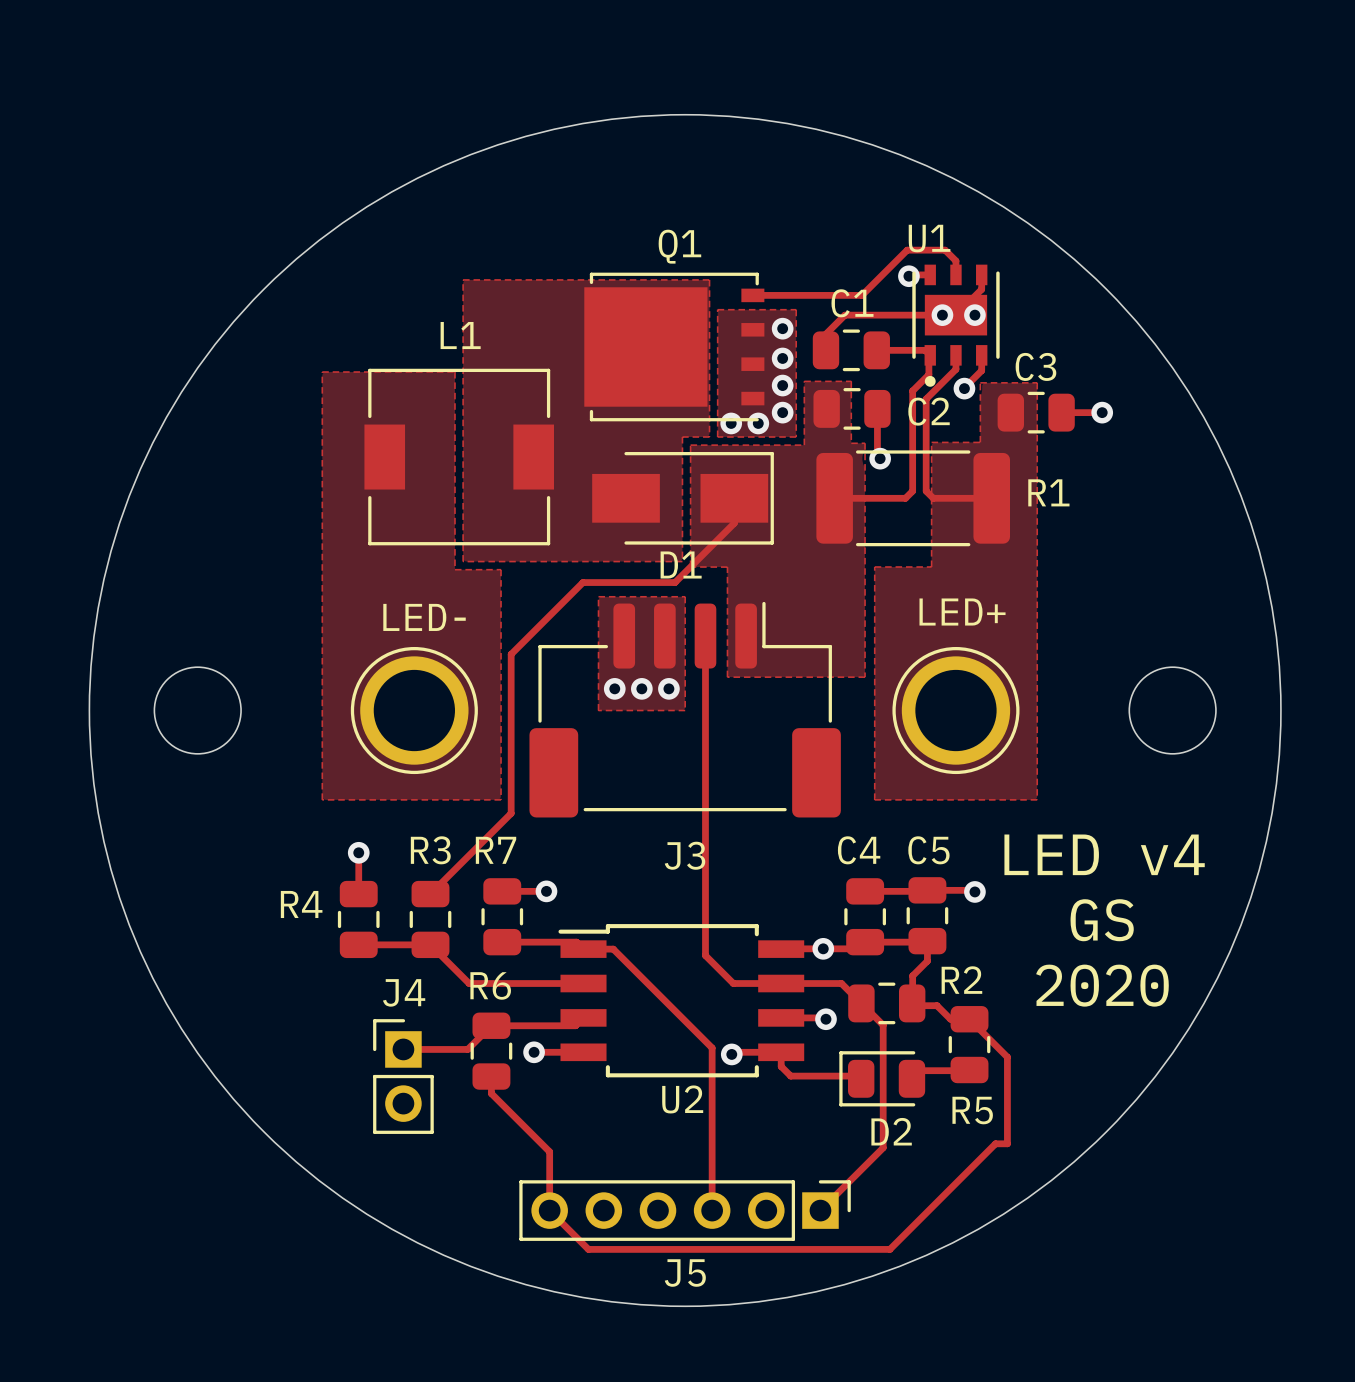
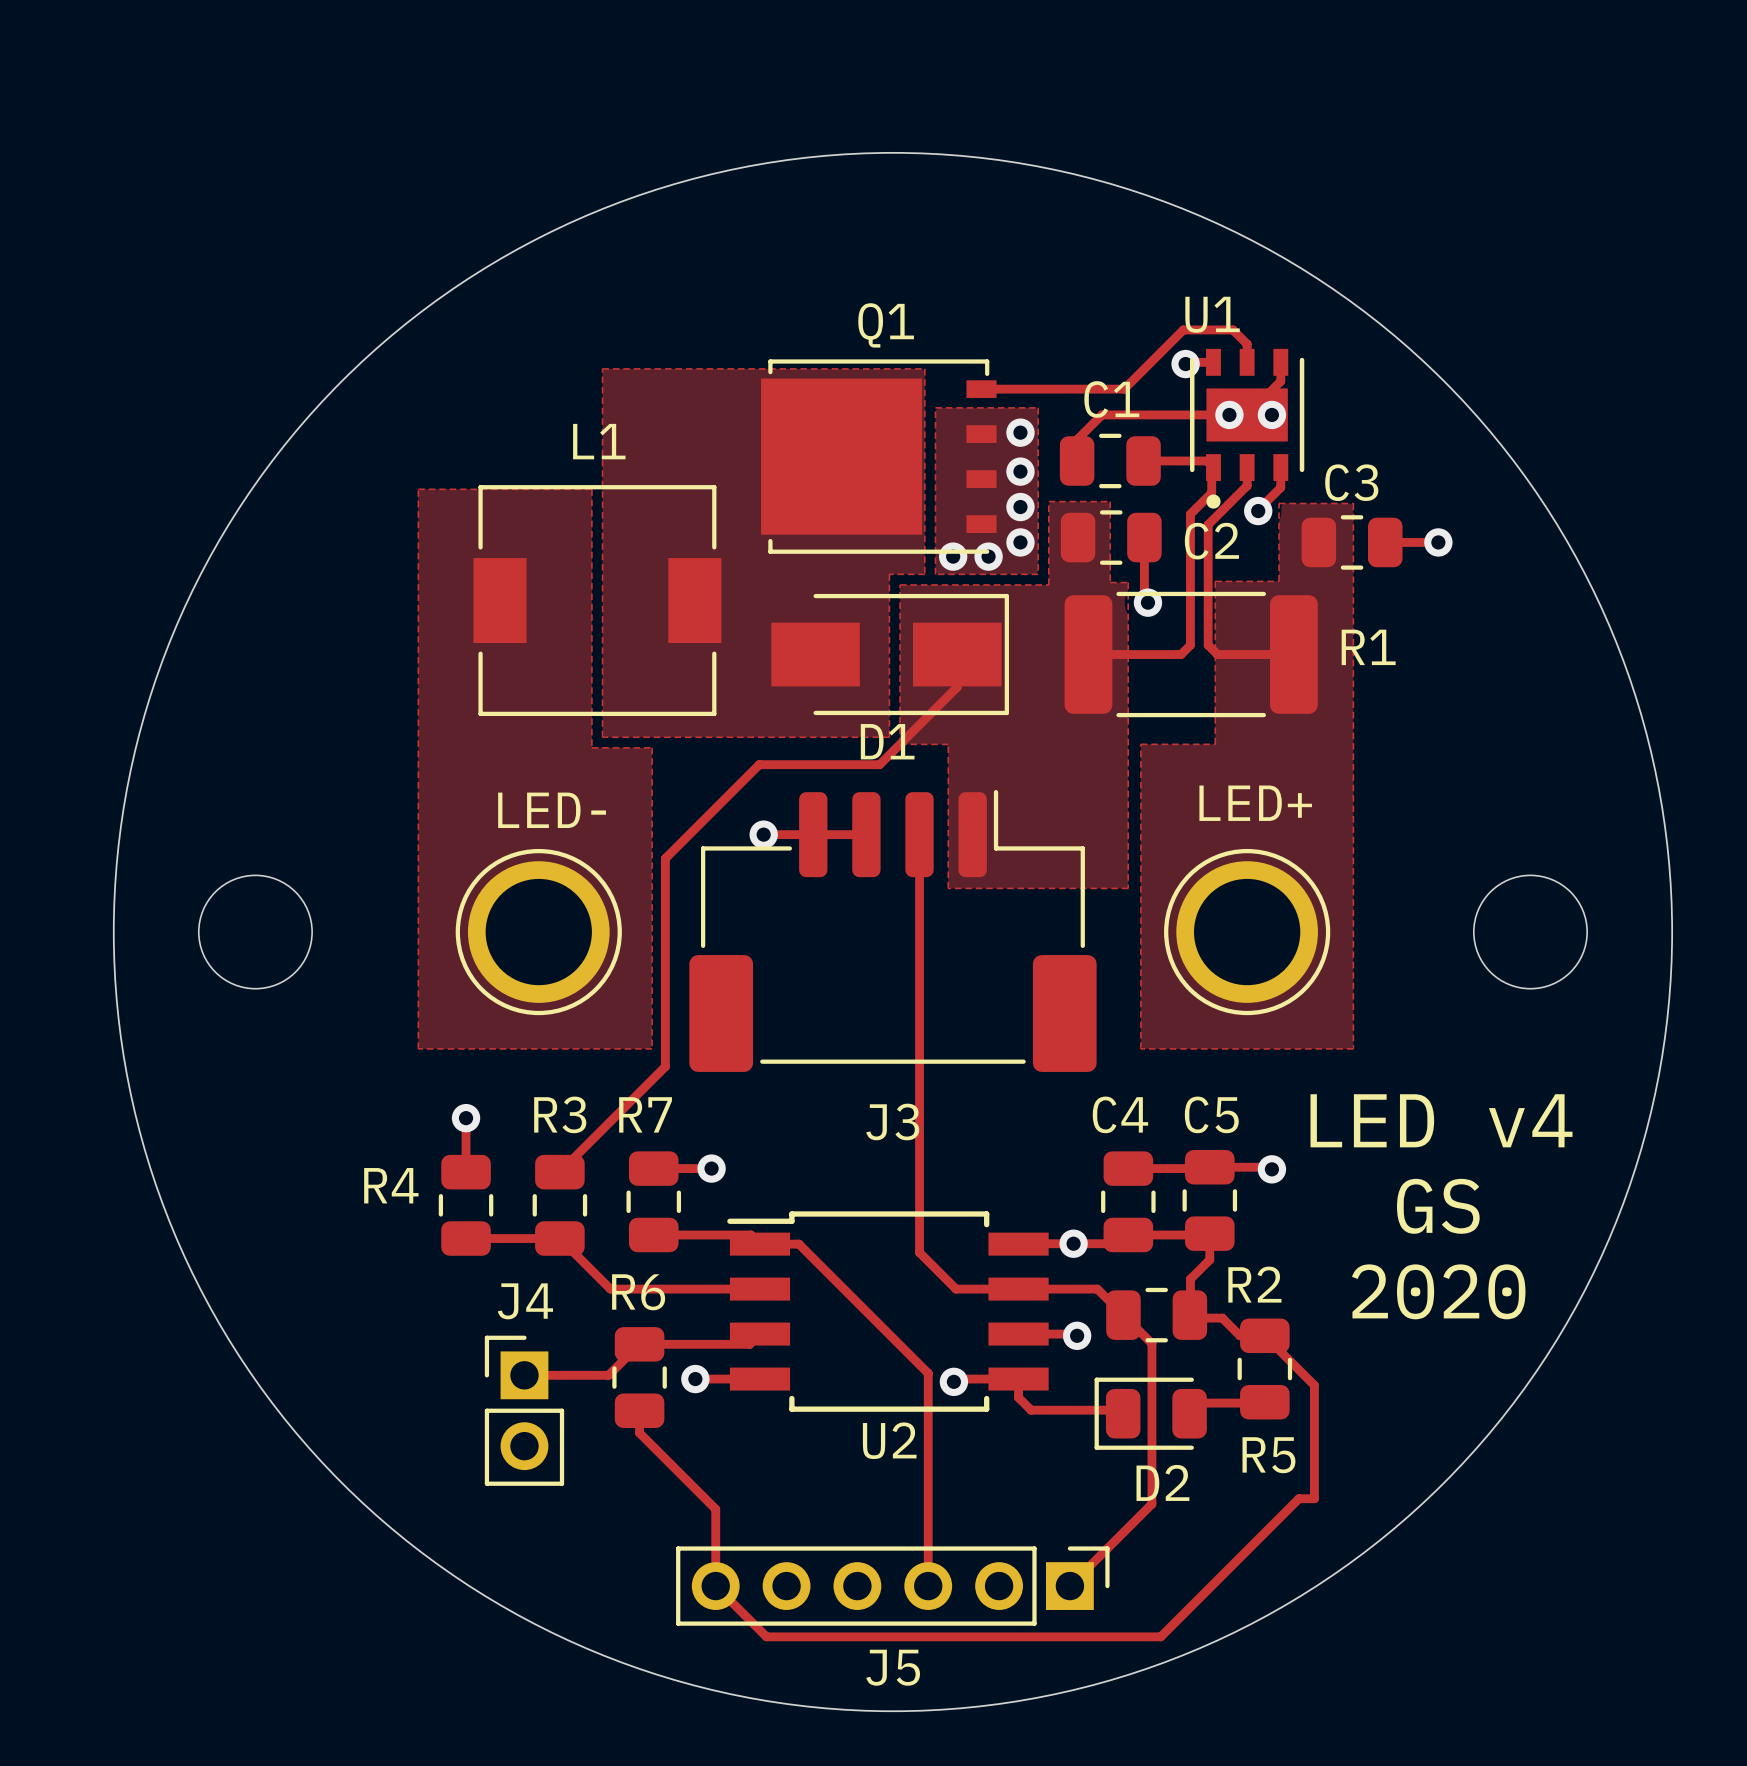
zone outline: (598, 596) (598, 710) (685, 710) (685, 596) (598, 596) -> none
track: none -> (763, 834) (866, 834)
via: none -> (763, 834)
via: (614, 688) -> none
via: (641, 688) -> none
via: (668, 688) -> none

